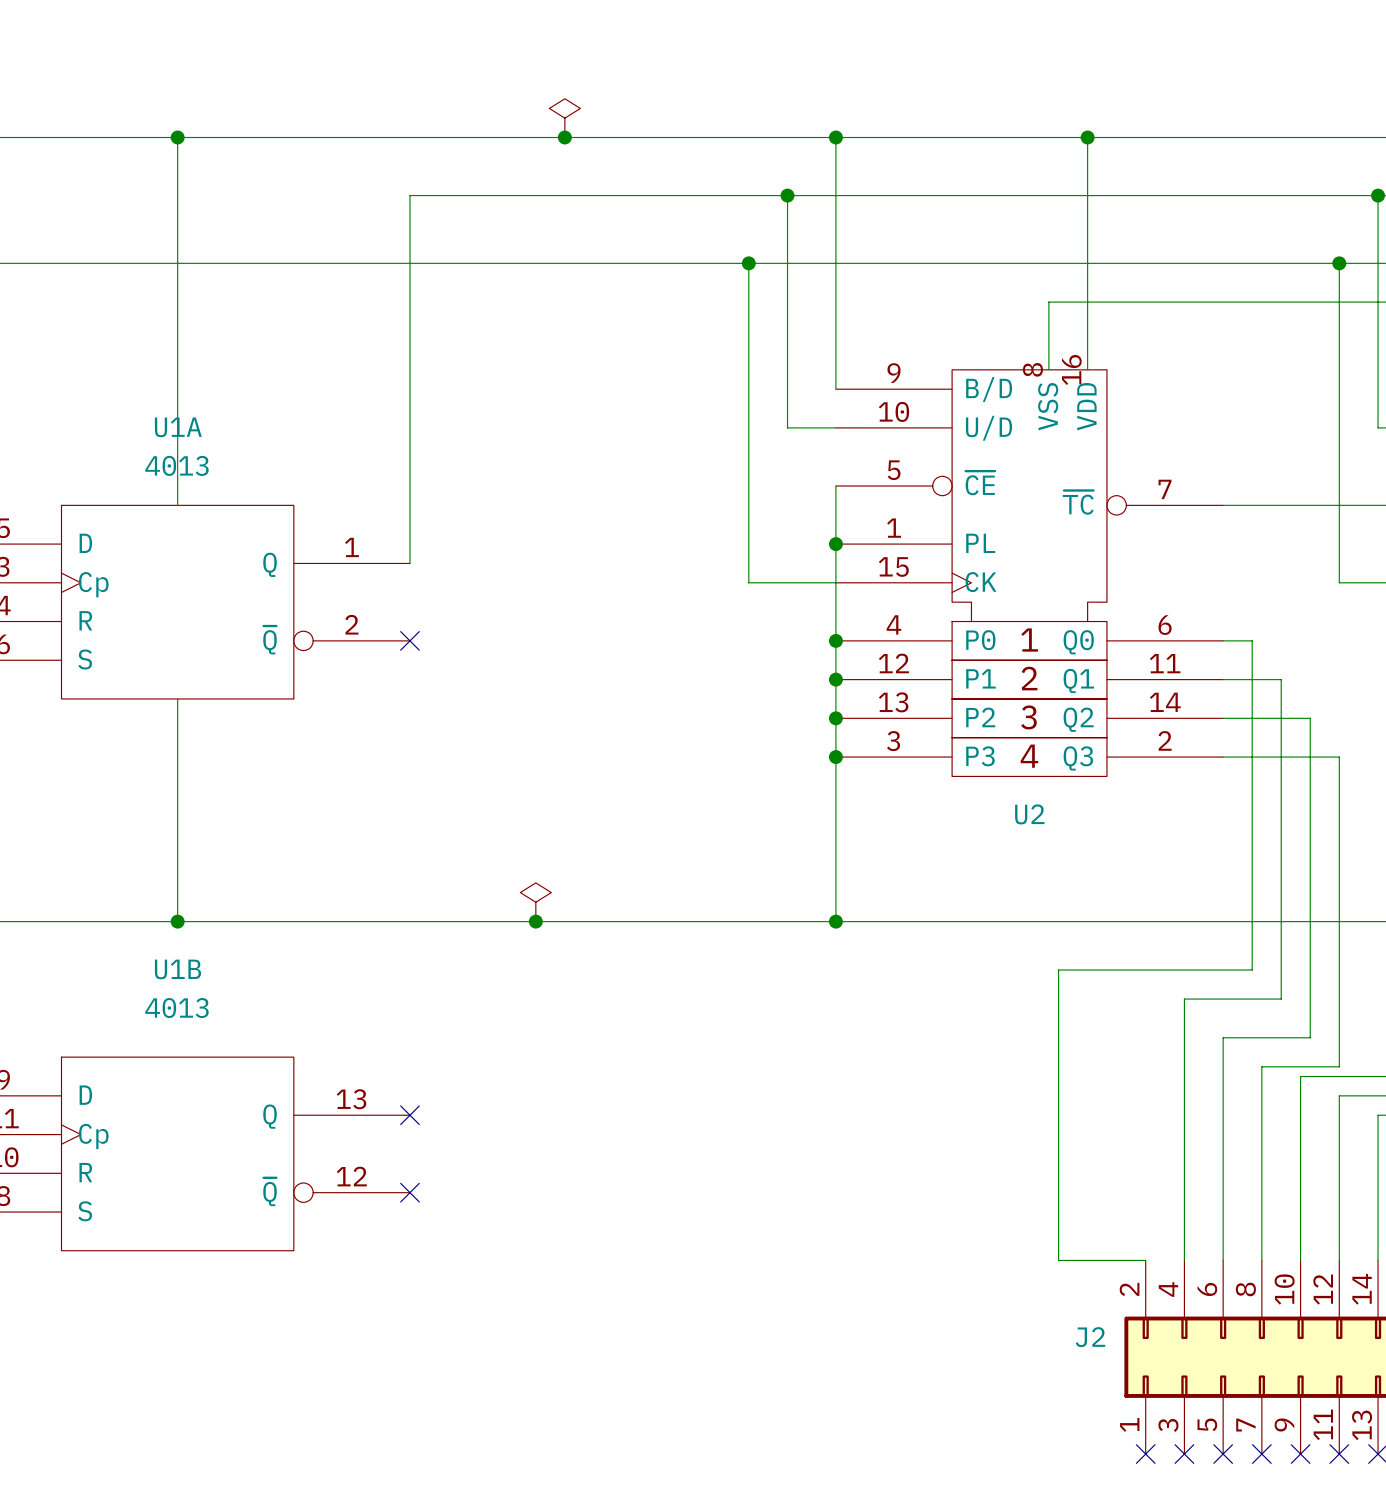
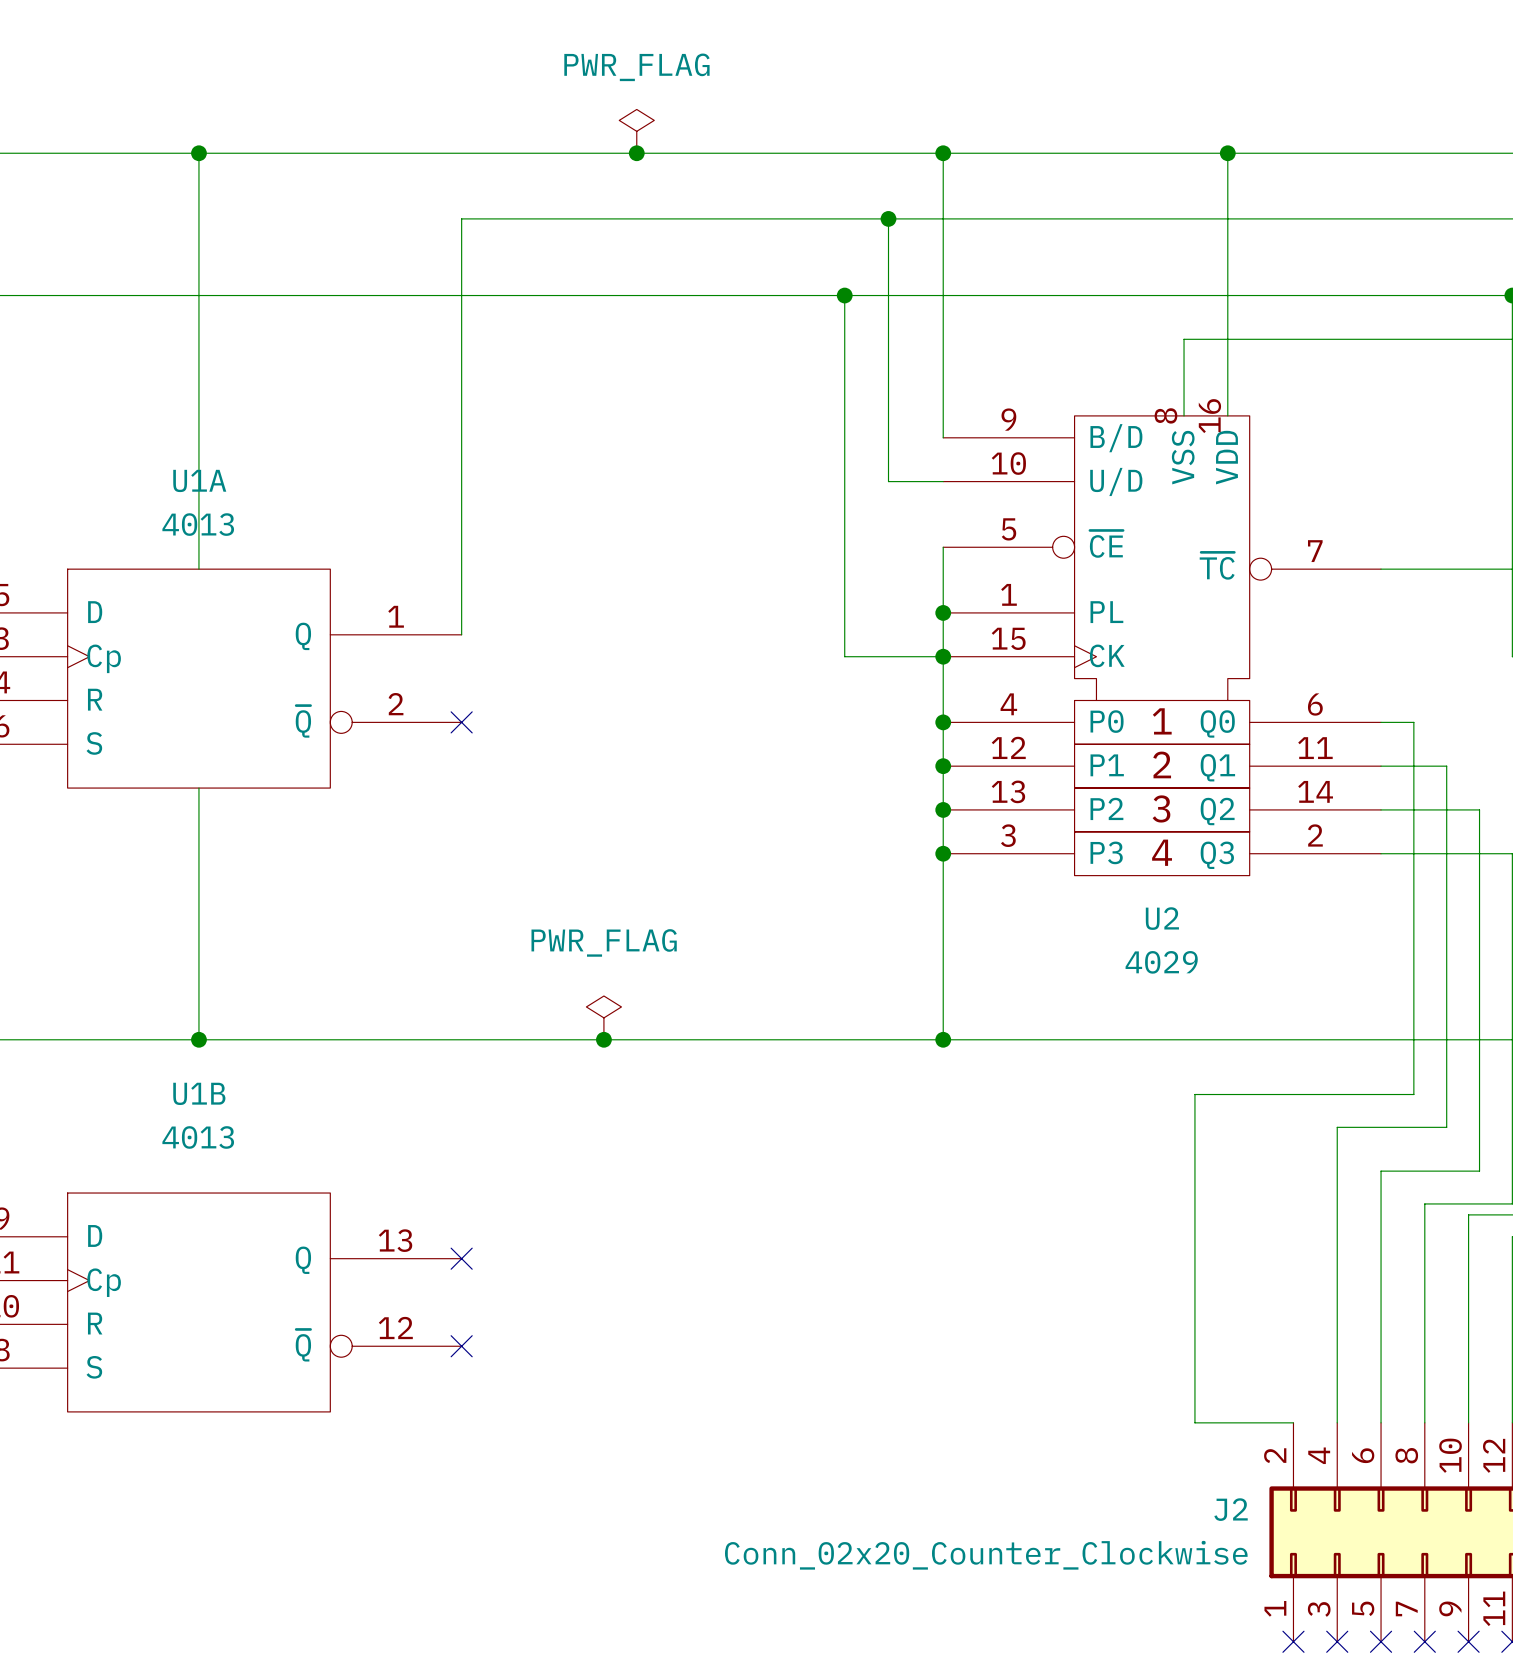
power symbol text: none -> PWR_FLAG (636, 67)
junction: none -> (943, 656)
power symbol text: none -> PWR_FLAG (604, 942)
U2 value: none -> 4029 (1161, 962)
J2 value: none -> Conn_02x20_Counter_Clockwise (986, 1555)

